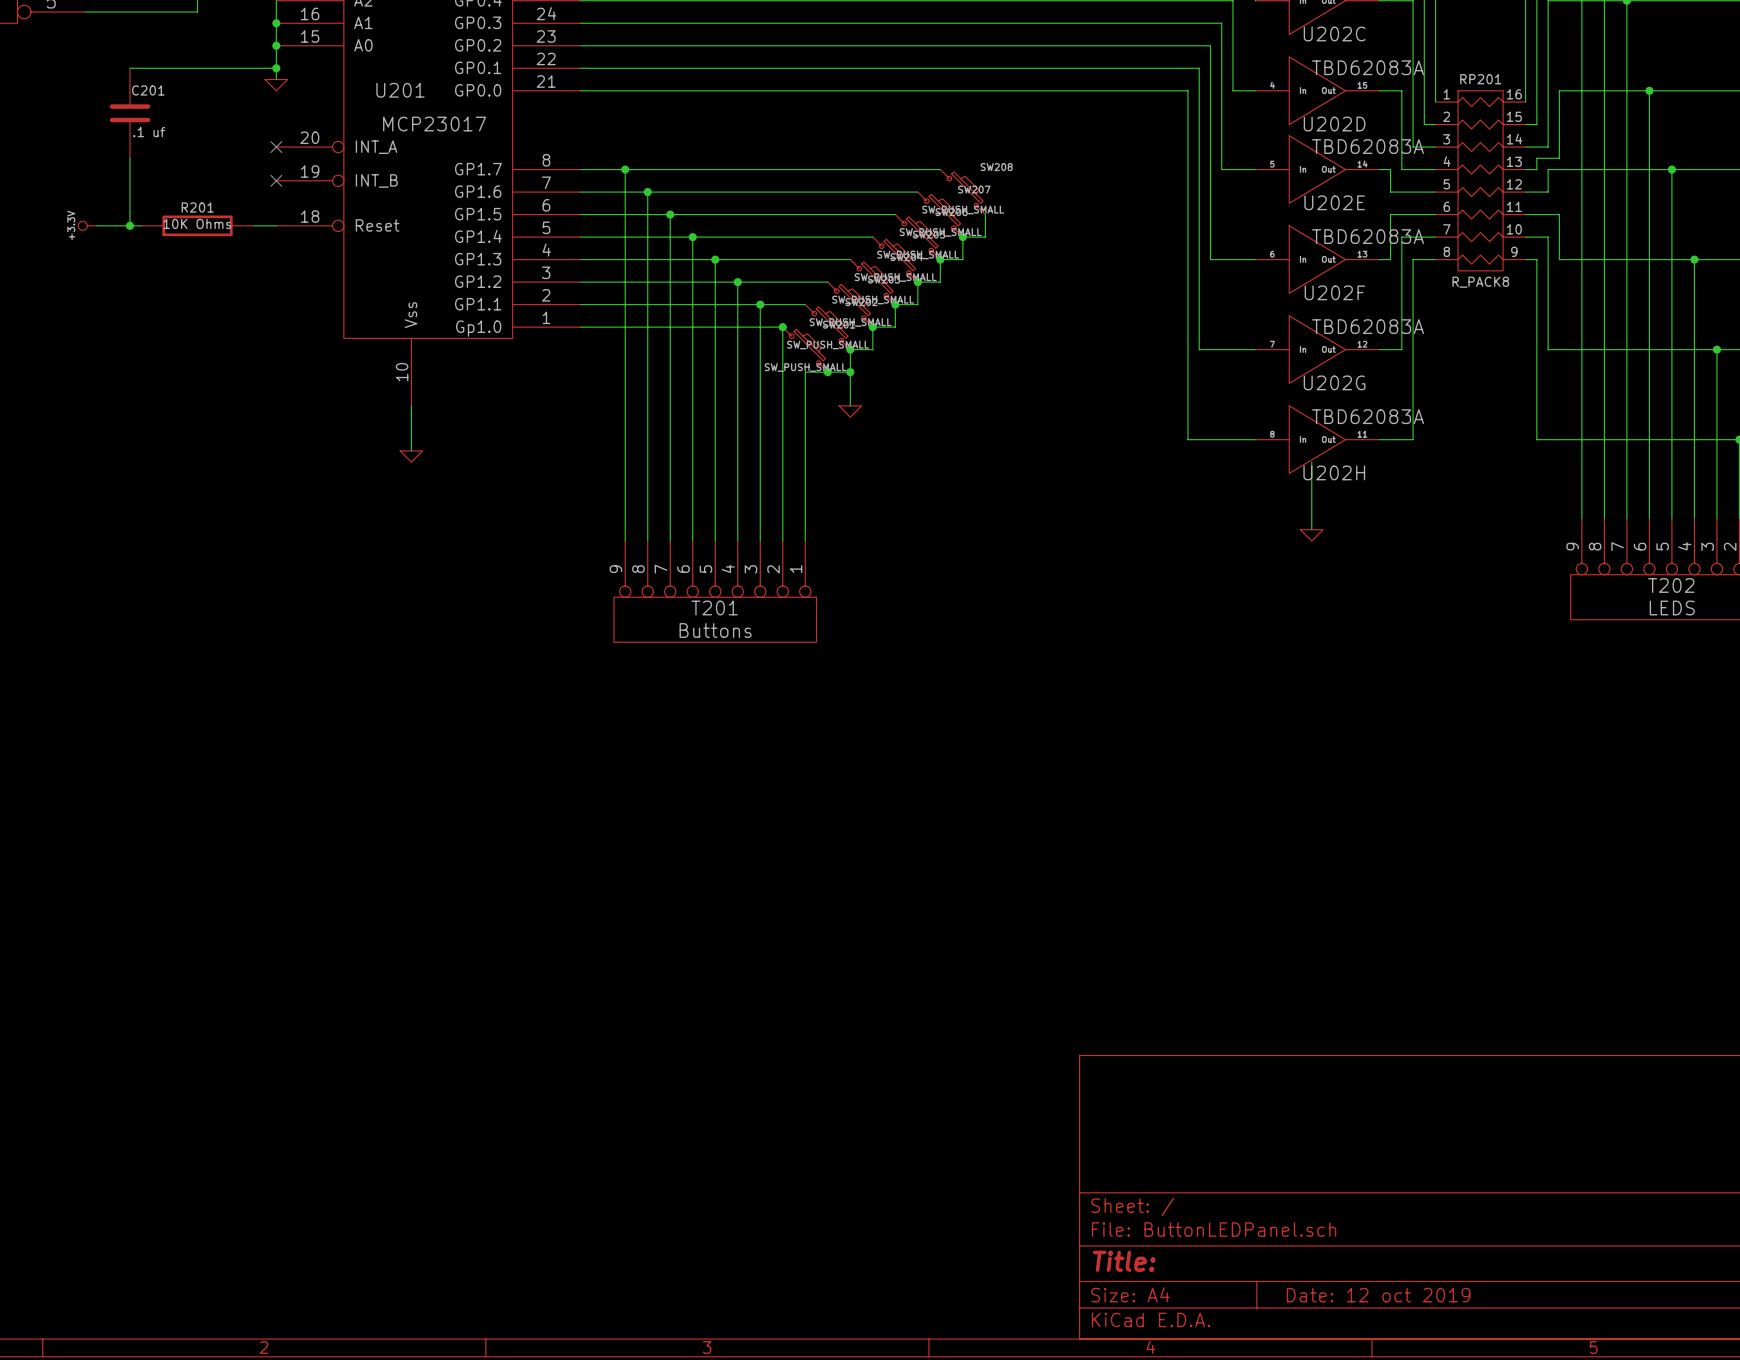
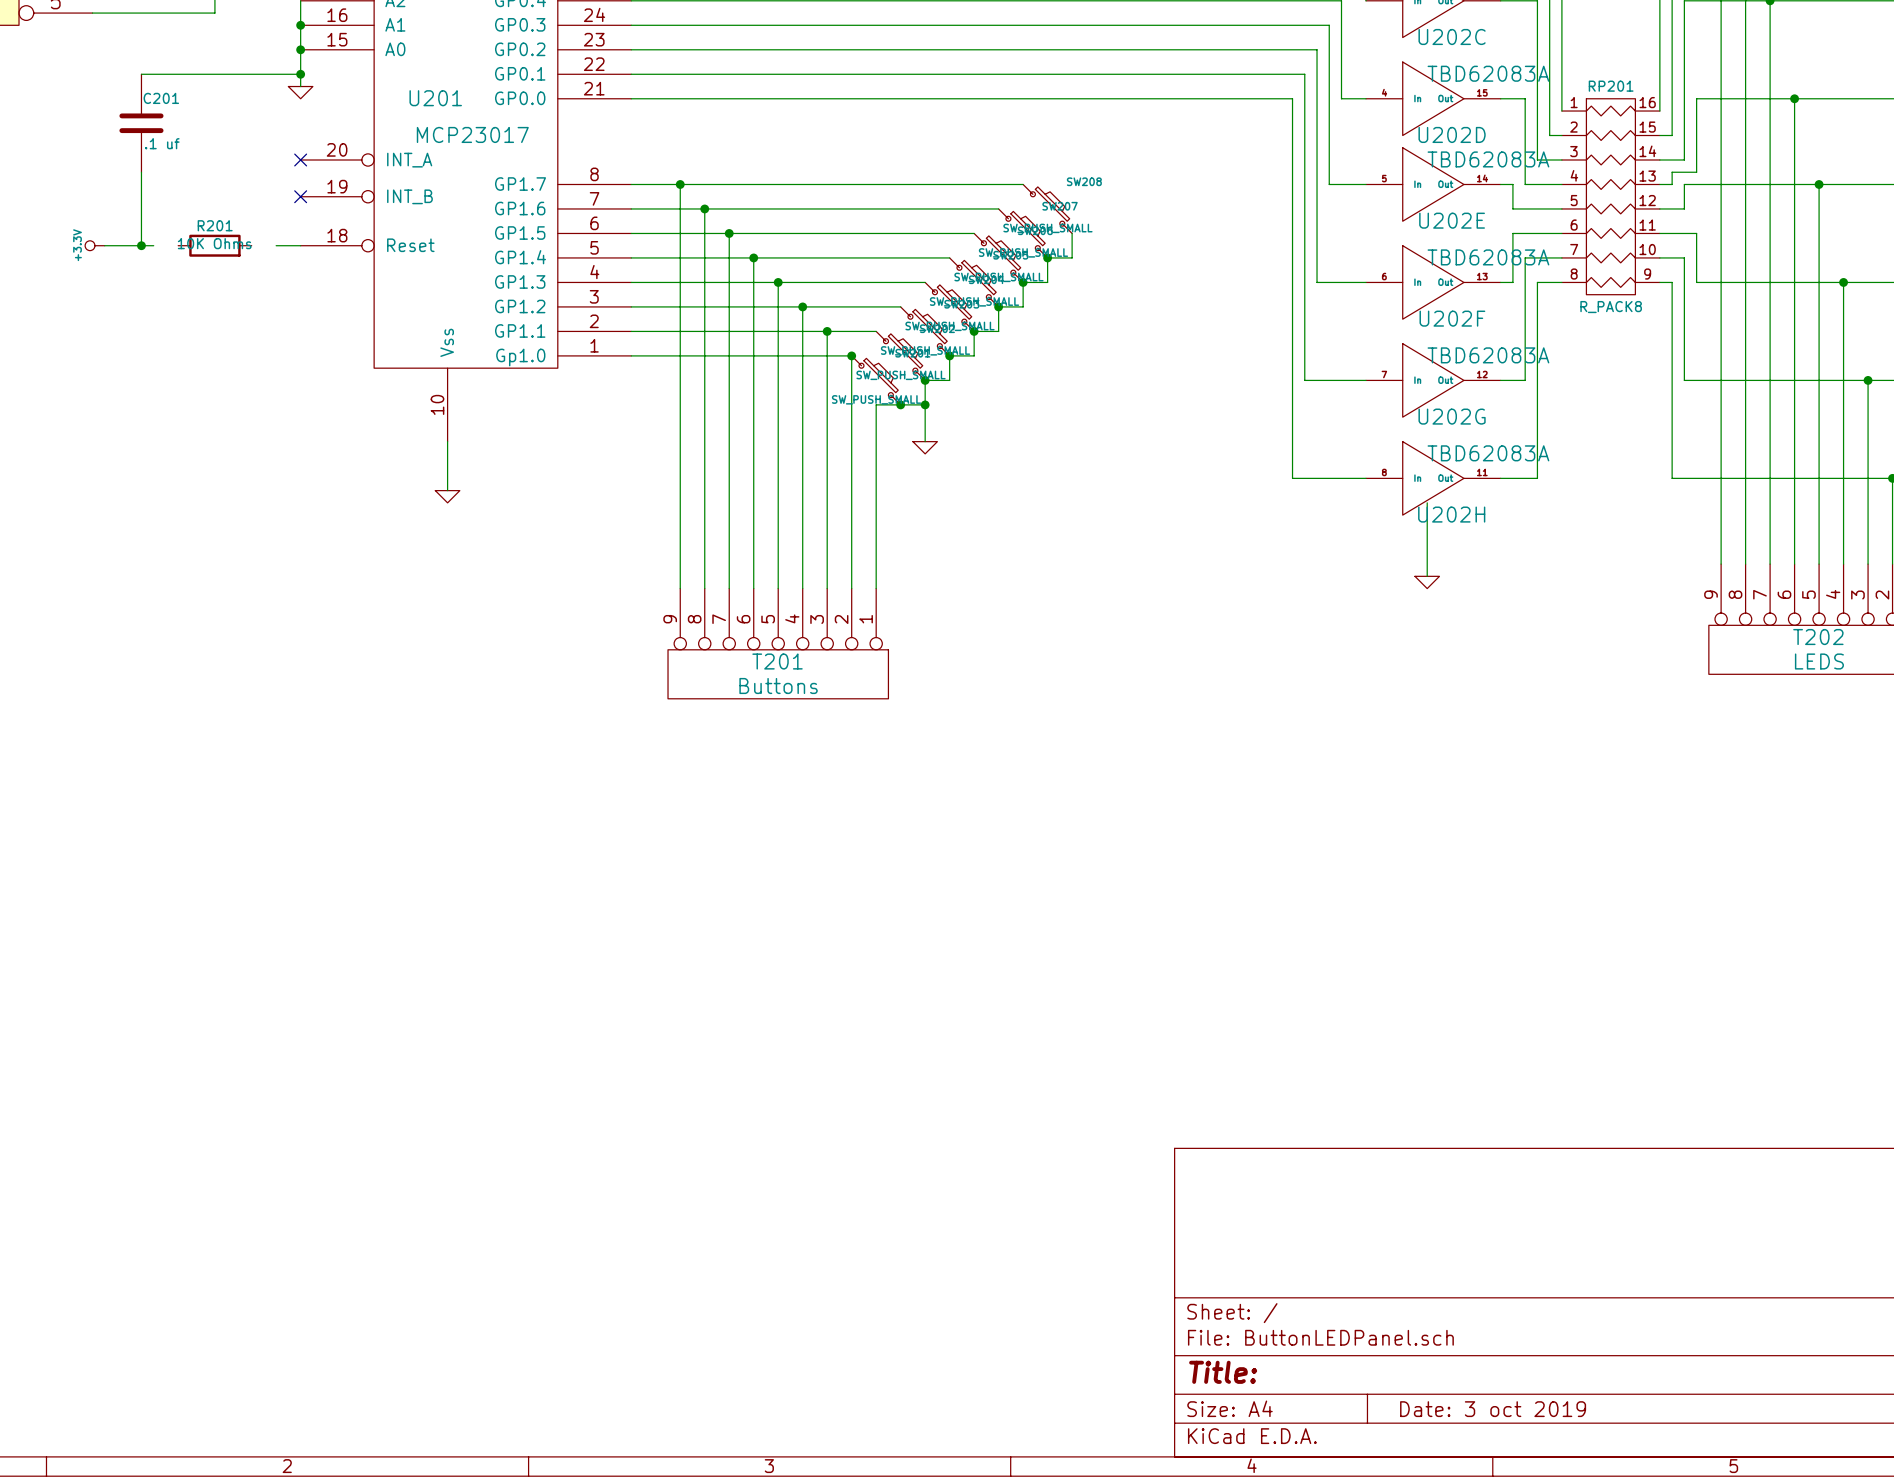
R201 symbol: [141, 215, 254, 237] -> [178, 234, 252, 257]
title block: Date: 12 oct 2019 (1378, 1295) -> Date: 3 oct 2019 (1493, 1409)

